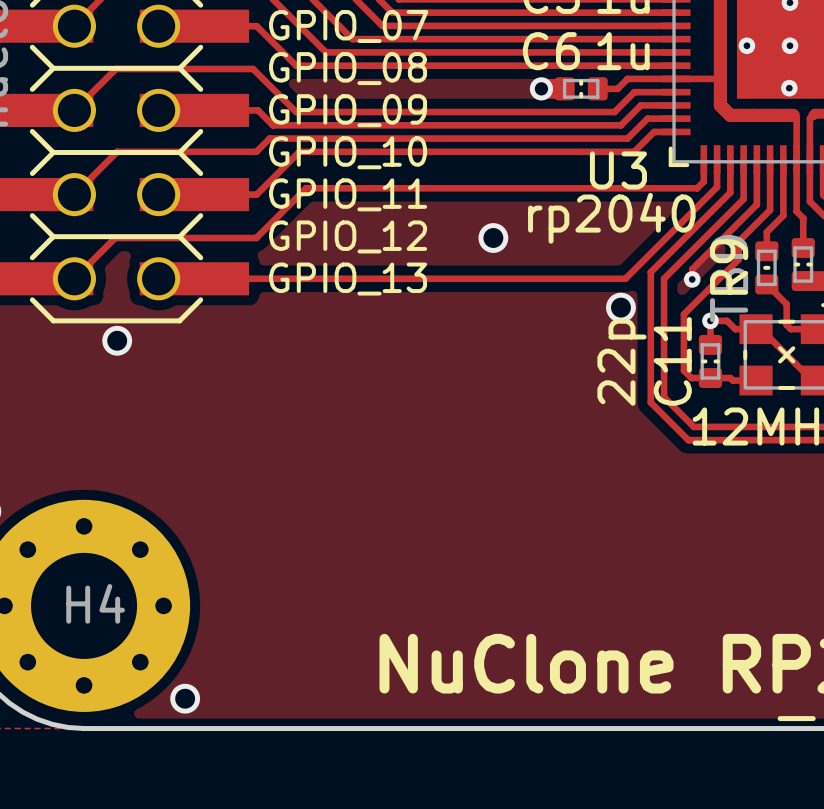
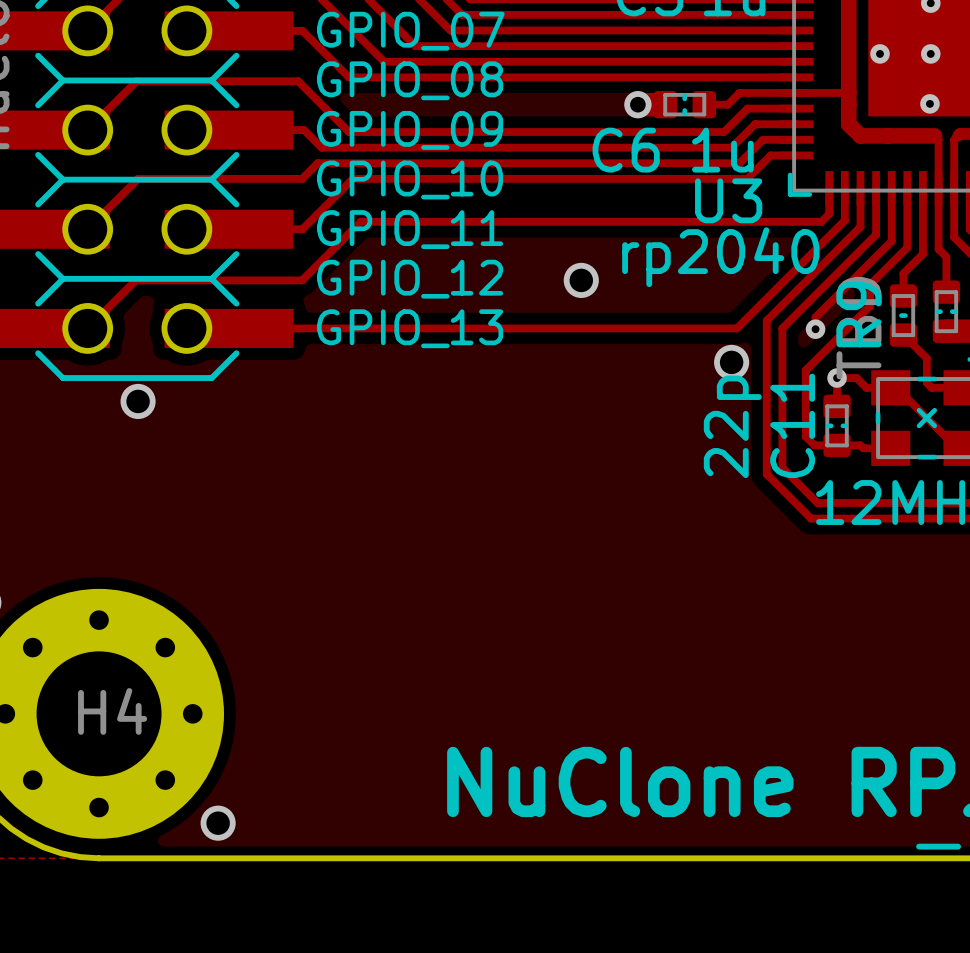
C6 name position: C6 (551, 51) -> C6 (626, 150)
C6 value position: 1u (623, 51) -> 1u (722, 150)

